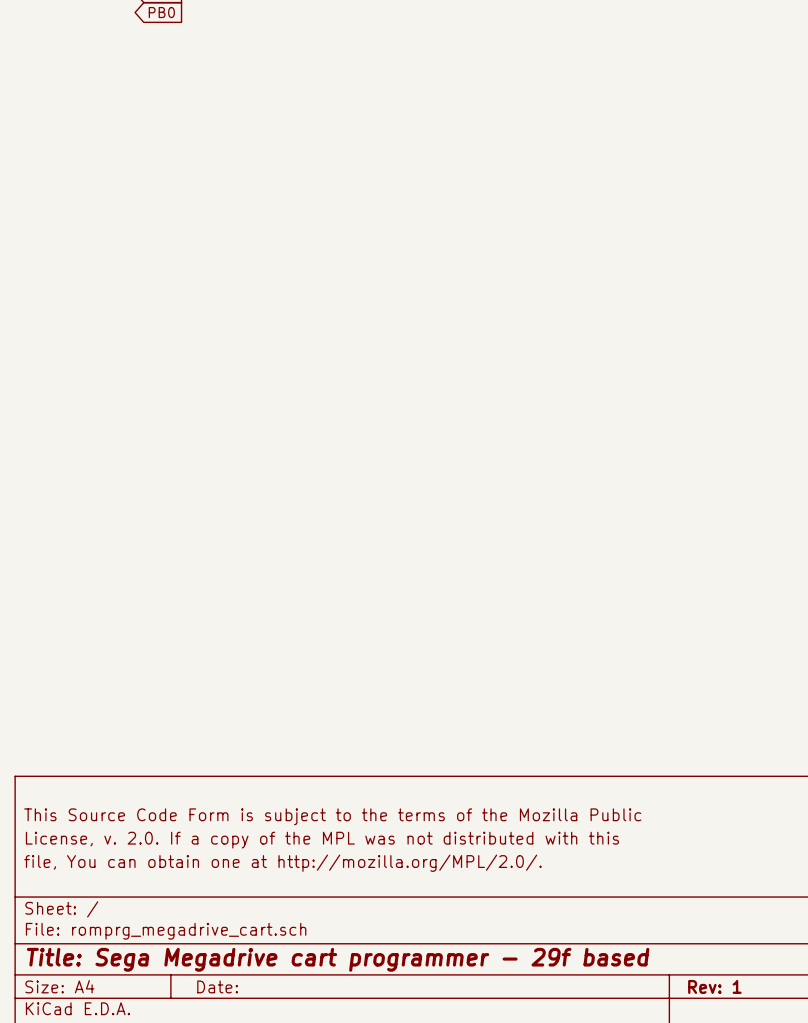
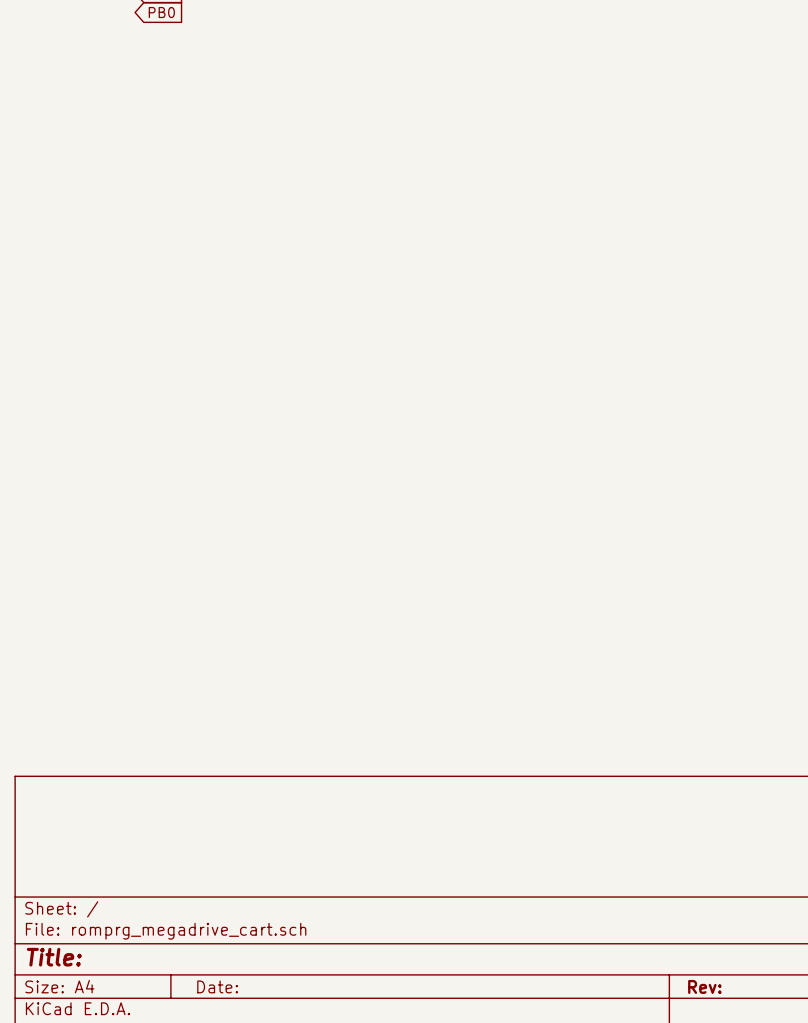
title block: This Source Code Form is subject to the terms of the Mozilla Public (332, 816) -> none
title block: License, v. 2.0. If a copy of the MPL was not distributed with this (322, 840) -> none
title block: file, You can obtain one at http://mozilla.org/MPL/2.0/. (282, 863) -> none
title block: Title: Sega Megadrive cart programmer - 29f based (338, 959) -> Title: (54, 957)
title block: Rev: 1 (714, 986) -> Rev: (704, 986)

